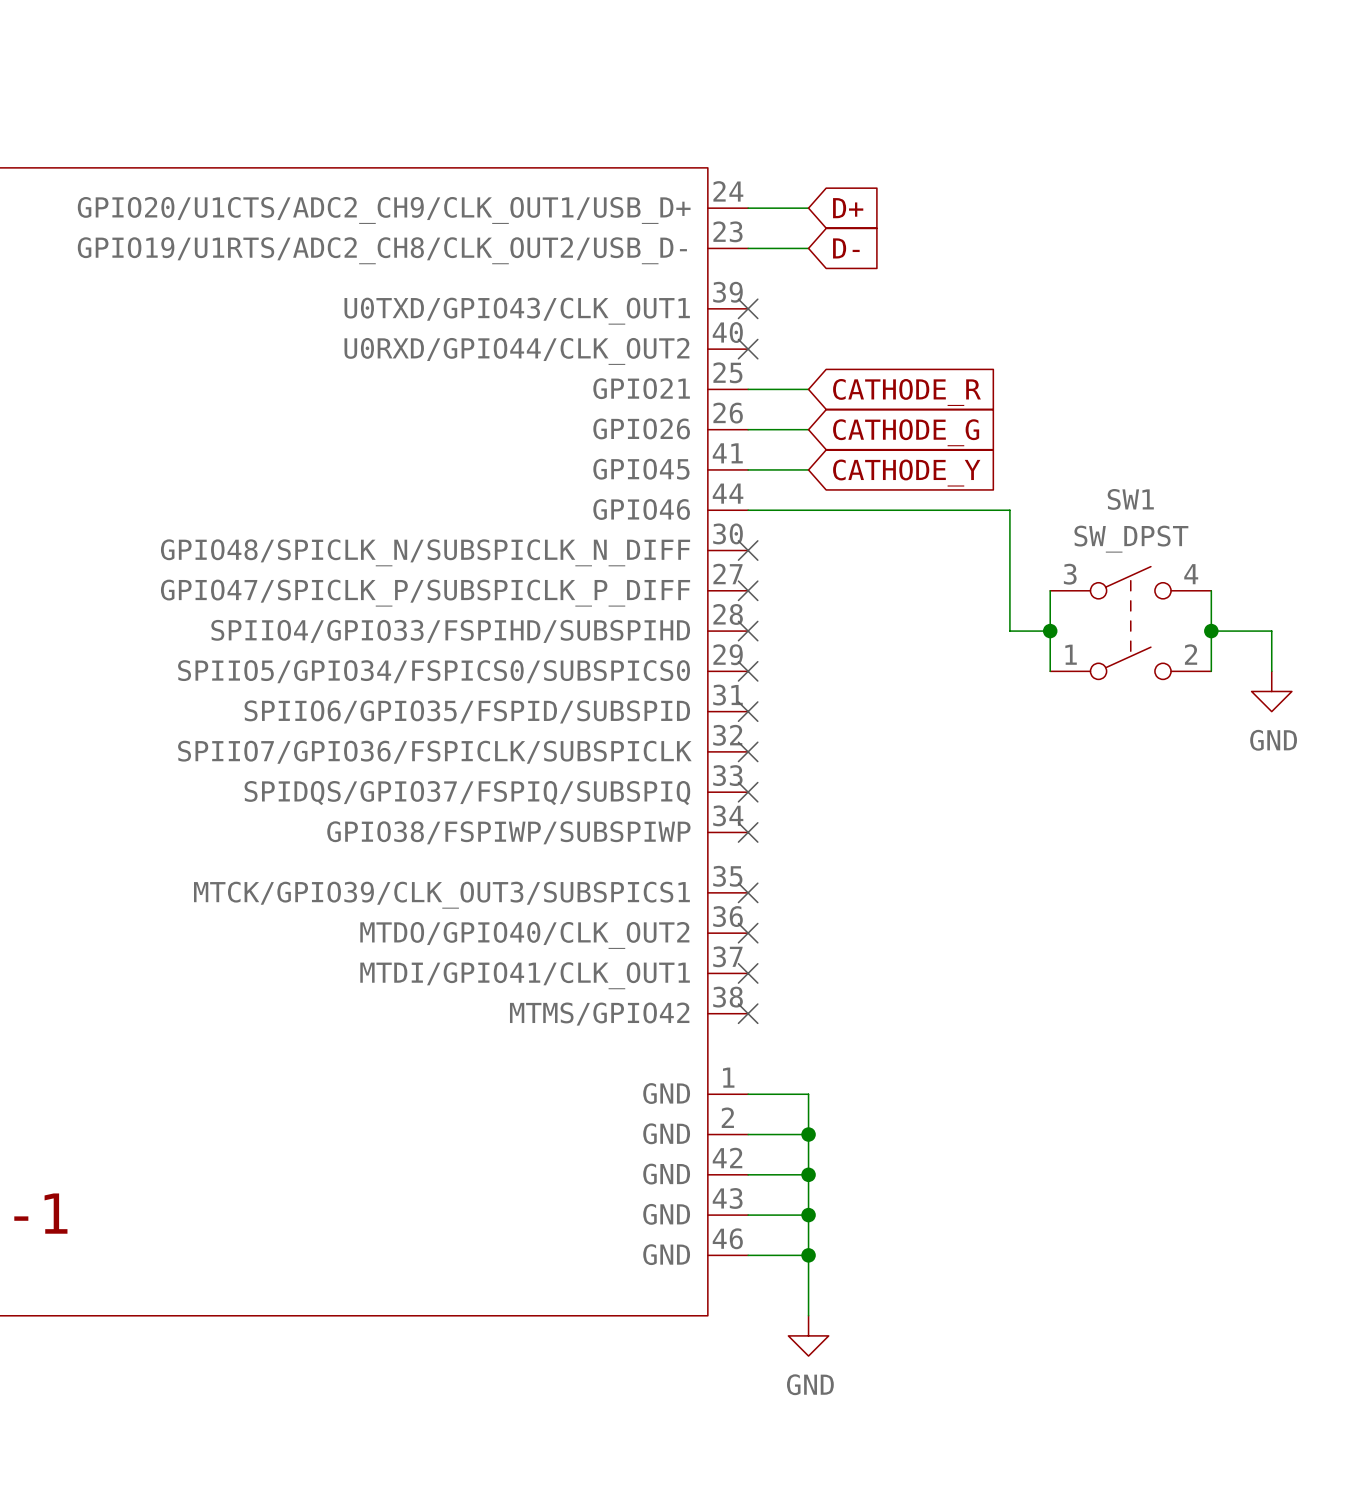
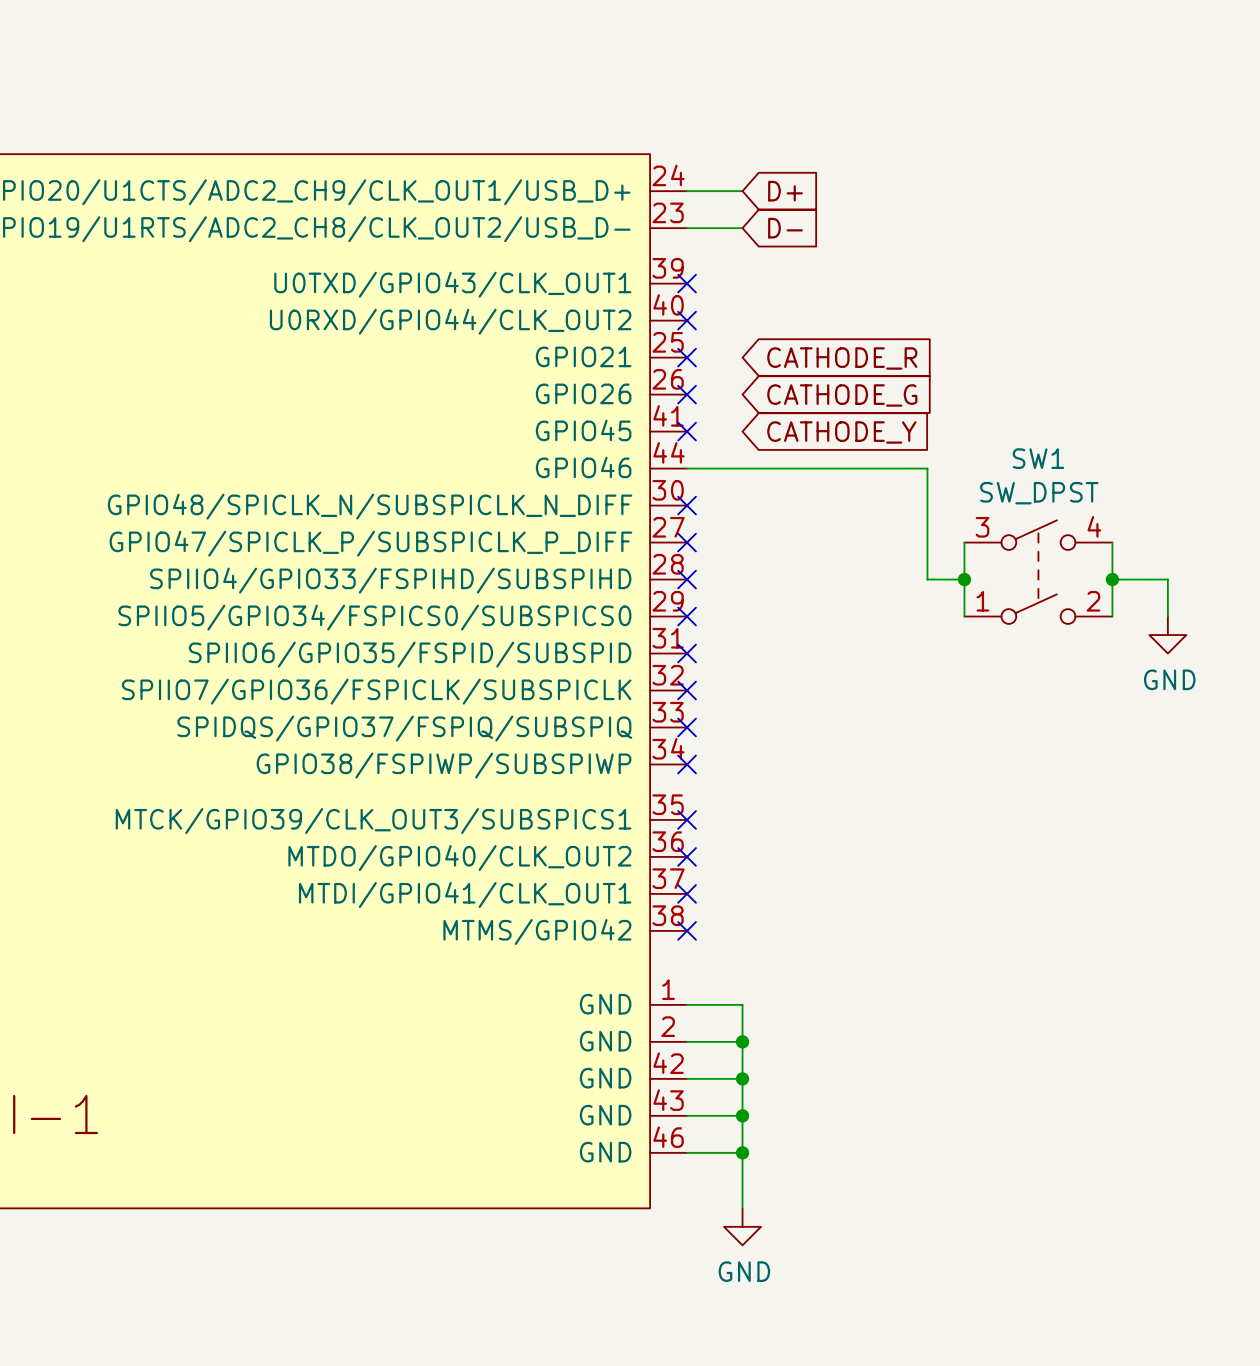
wire: (748, 389) (808, 389) -> none
no-connect mark: none -> (687, 357)
wire: (748, 429) (808, 429) -> none
no-connect mark: none -> (687, 394)
wire: (748, 469) (808, 469) -> none
no-connect mark: none -> (687, 431)

